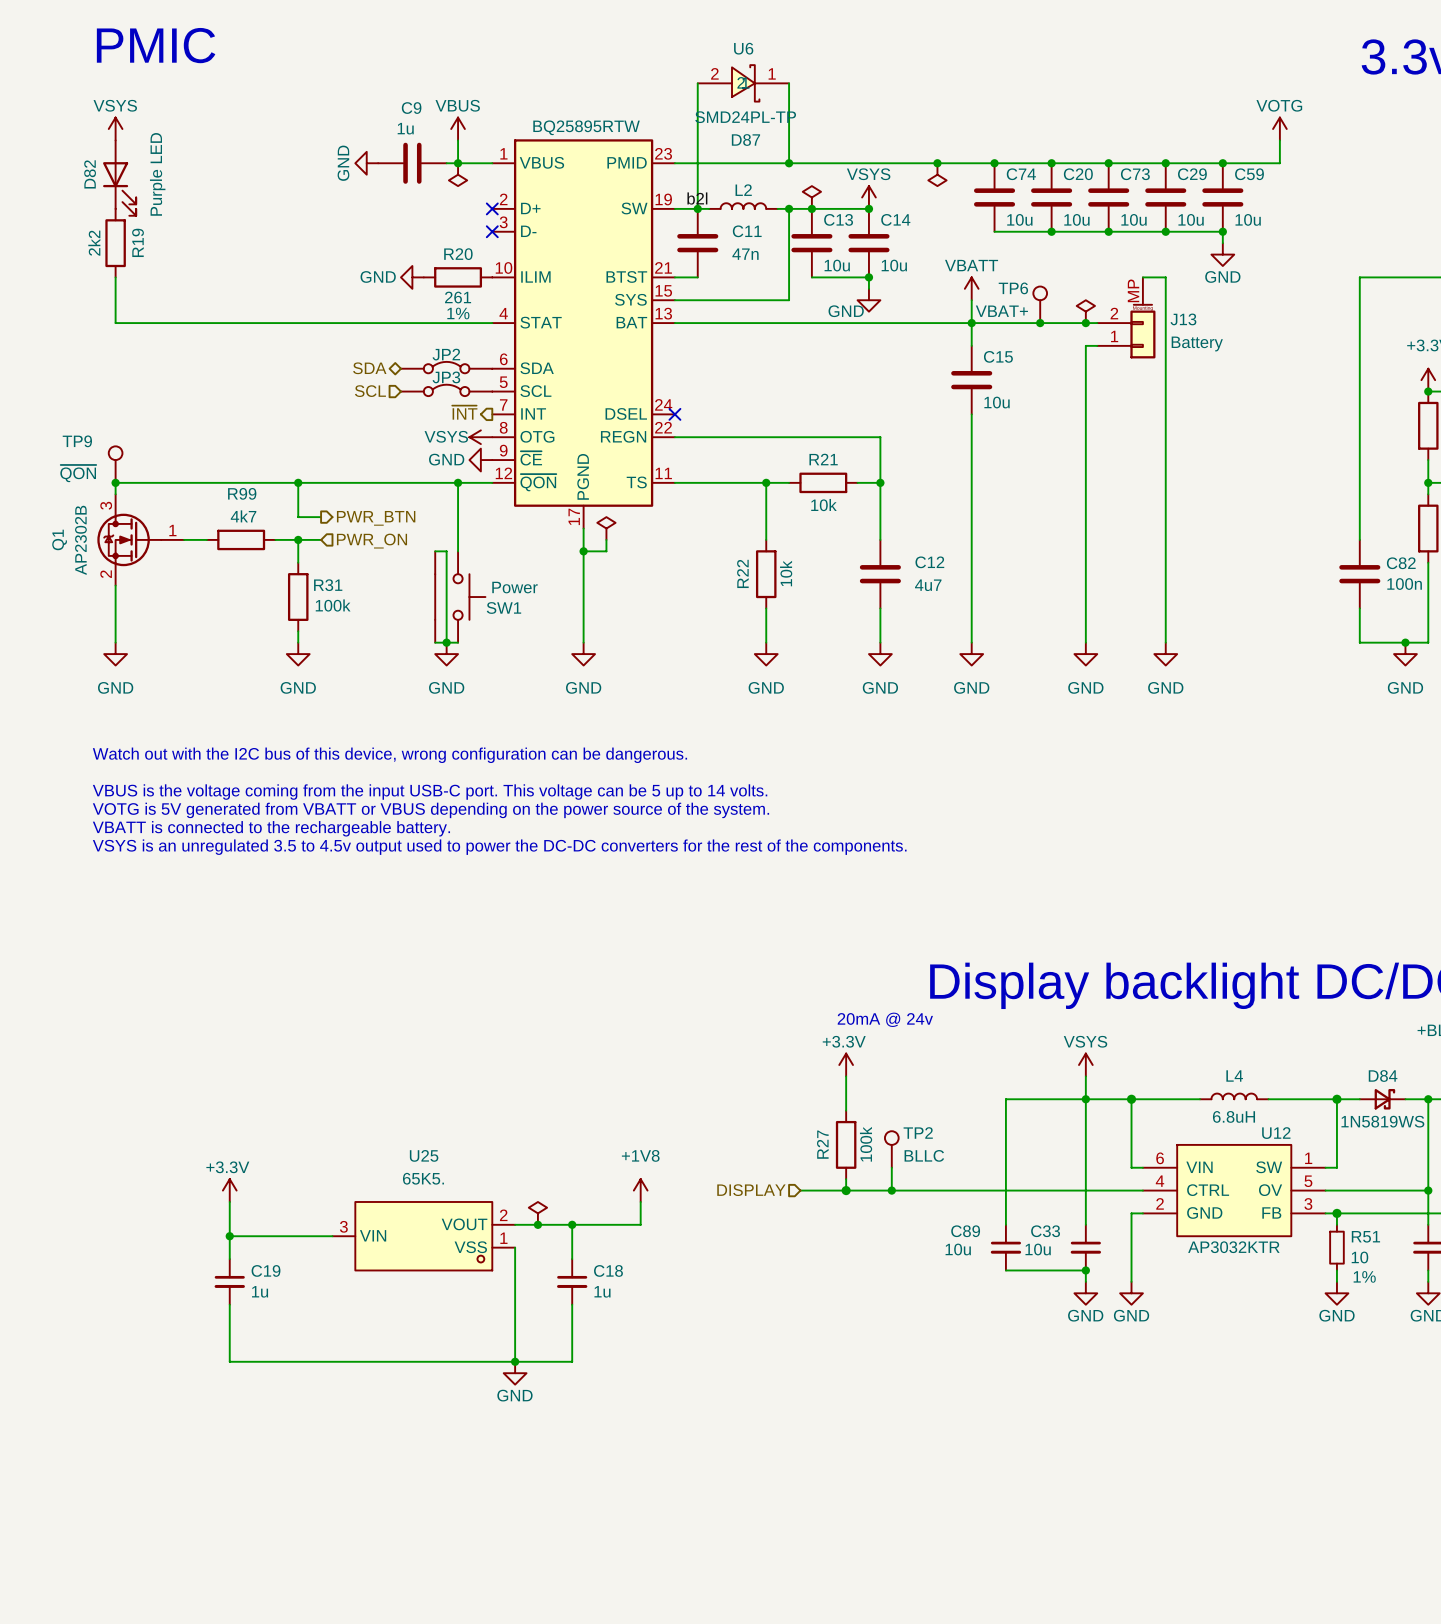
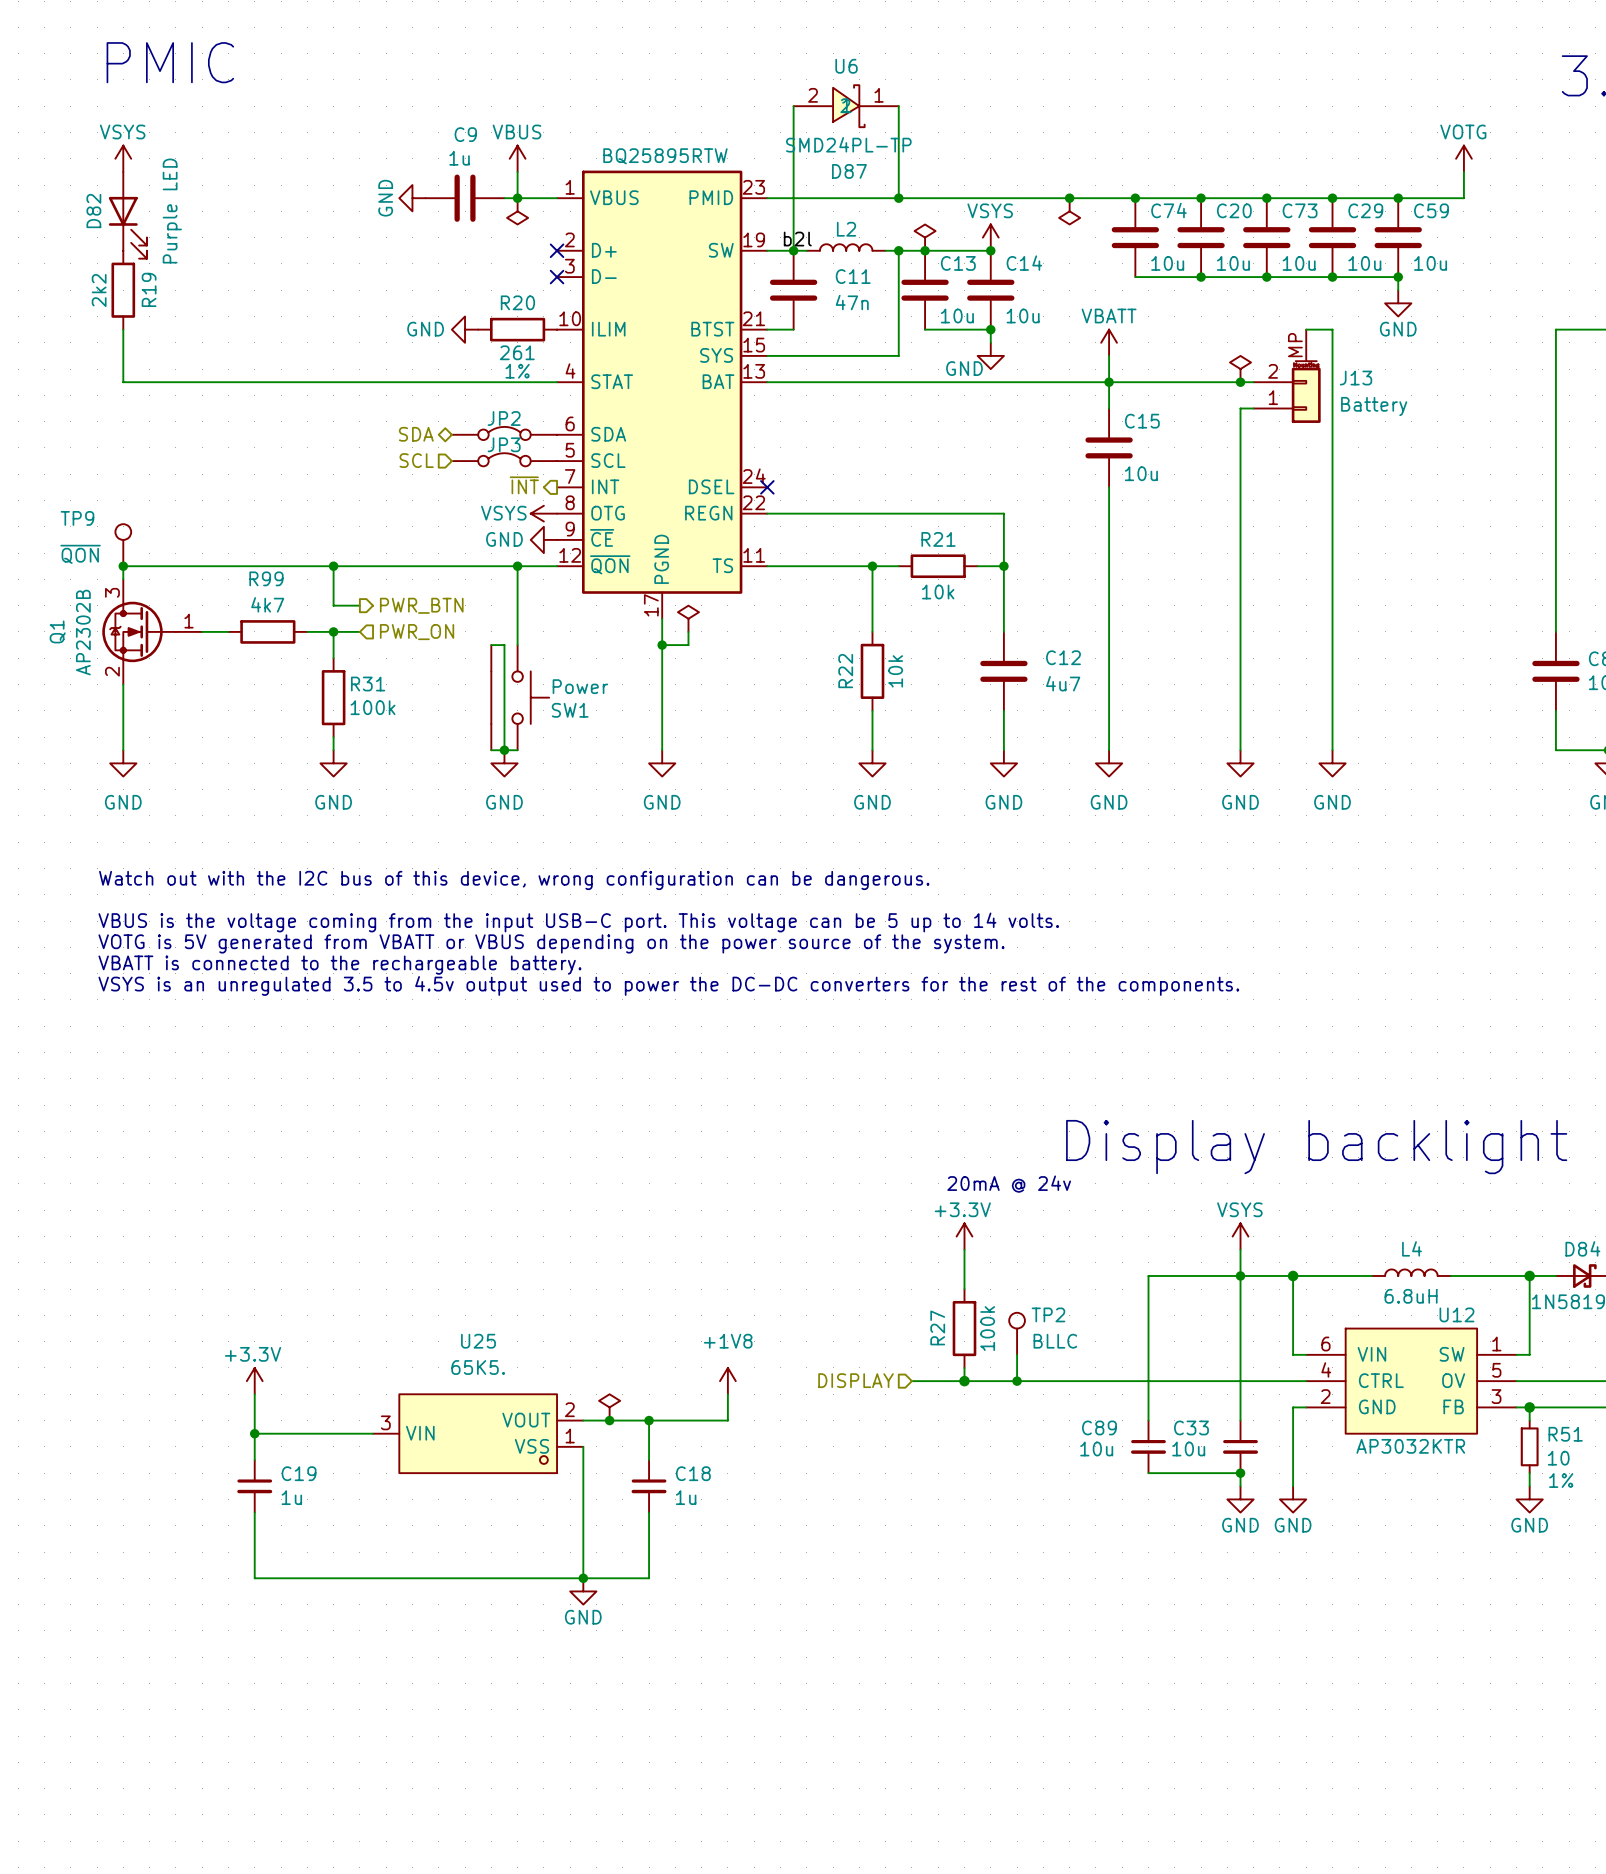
TP6: VBAT+ (1040, 304) -> none
junction: (1040, 323) -> none

